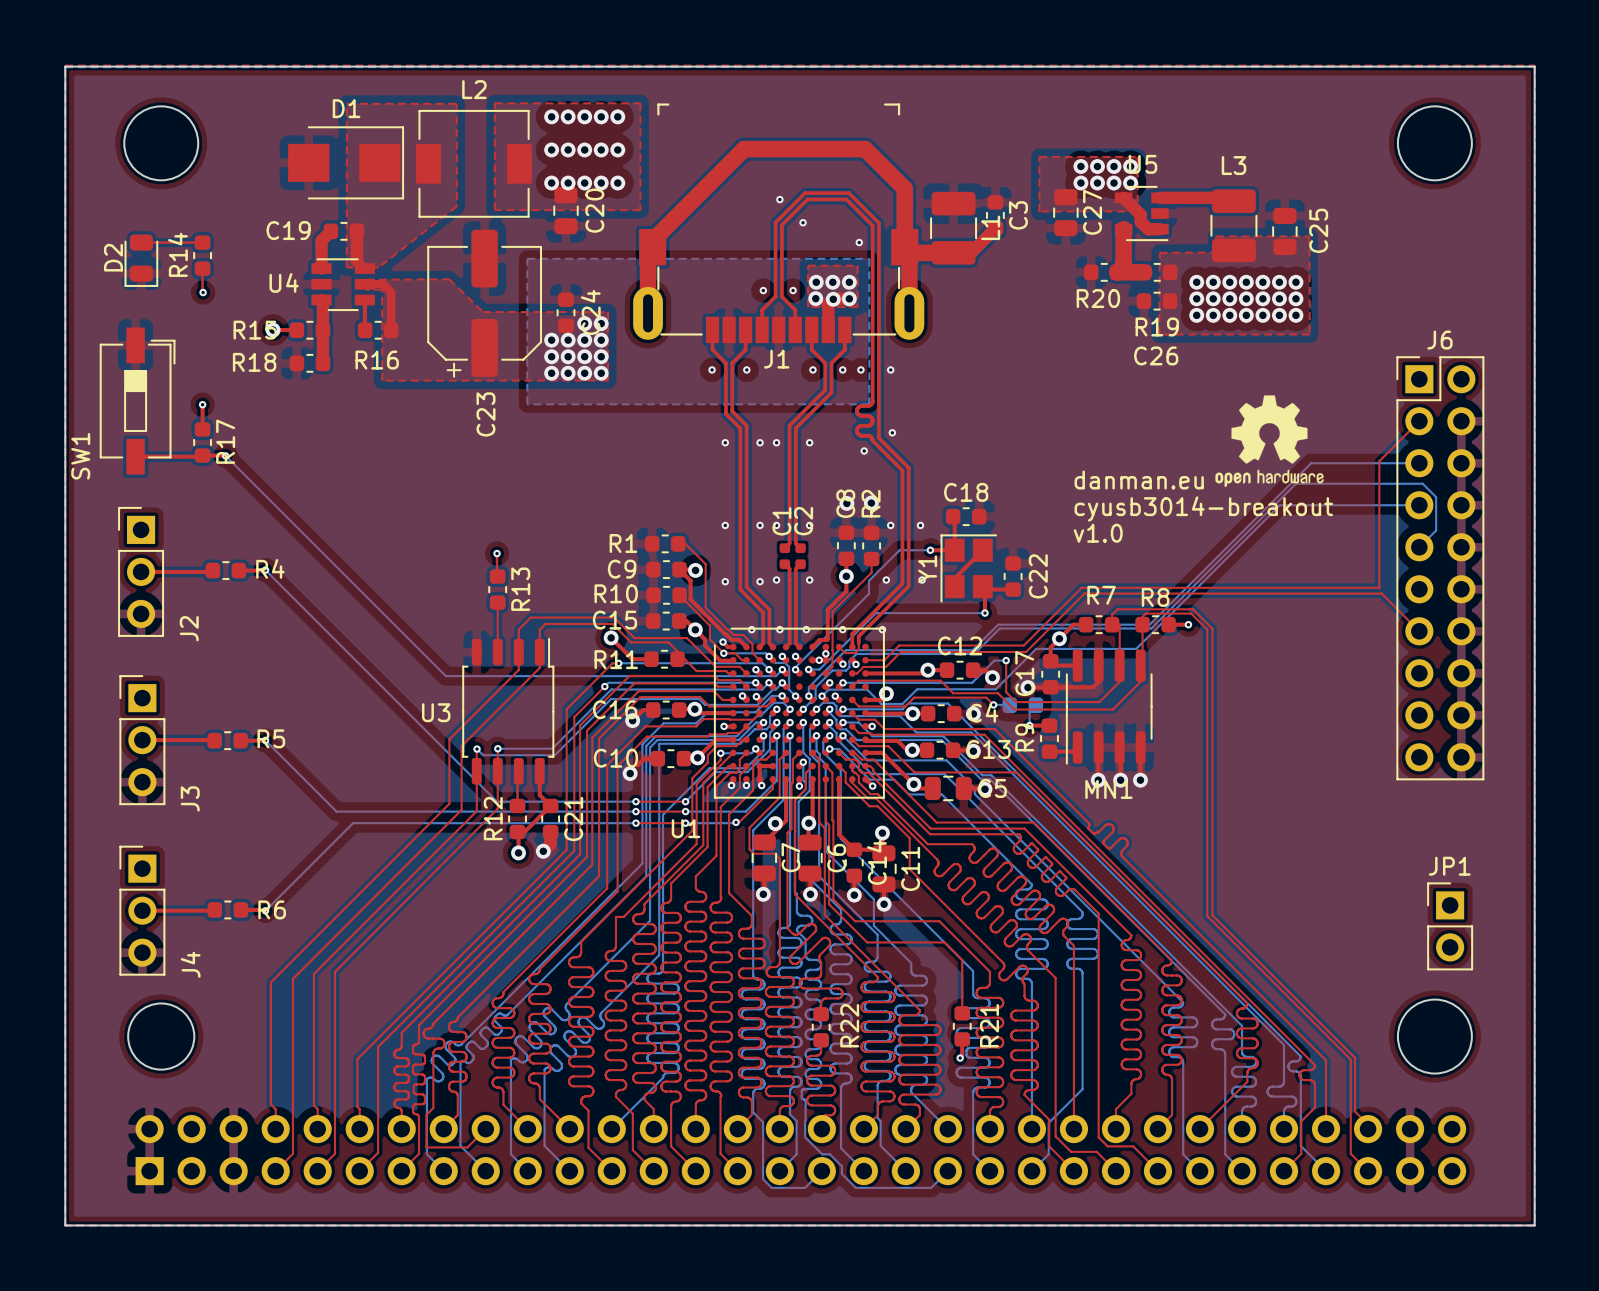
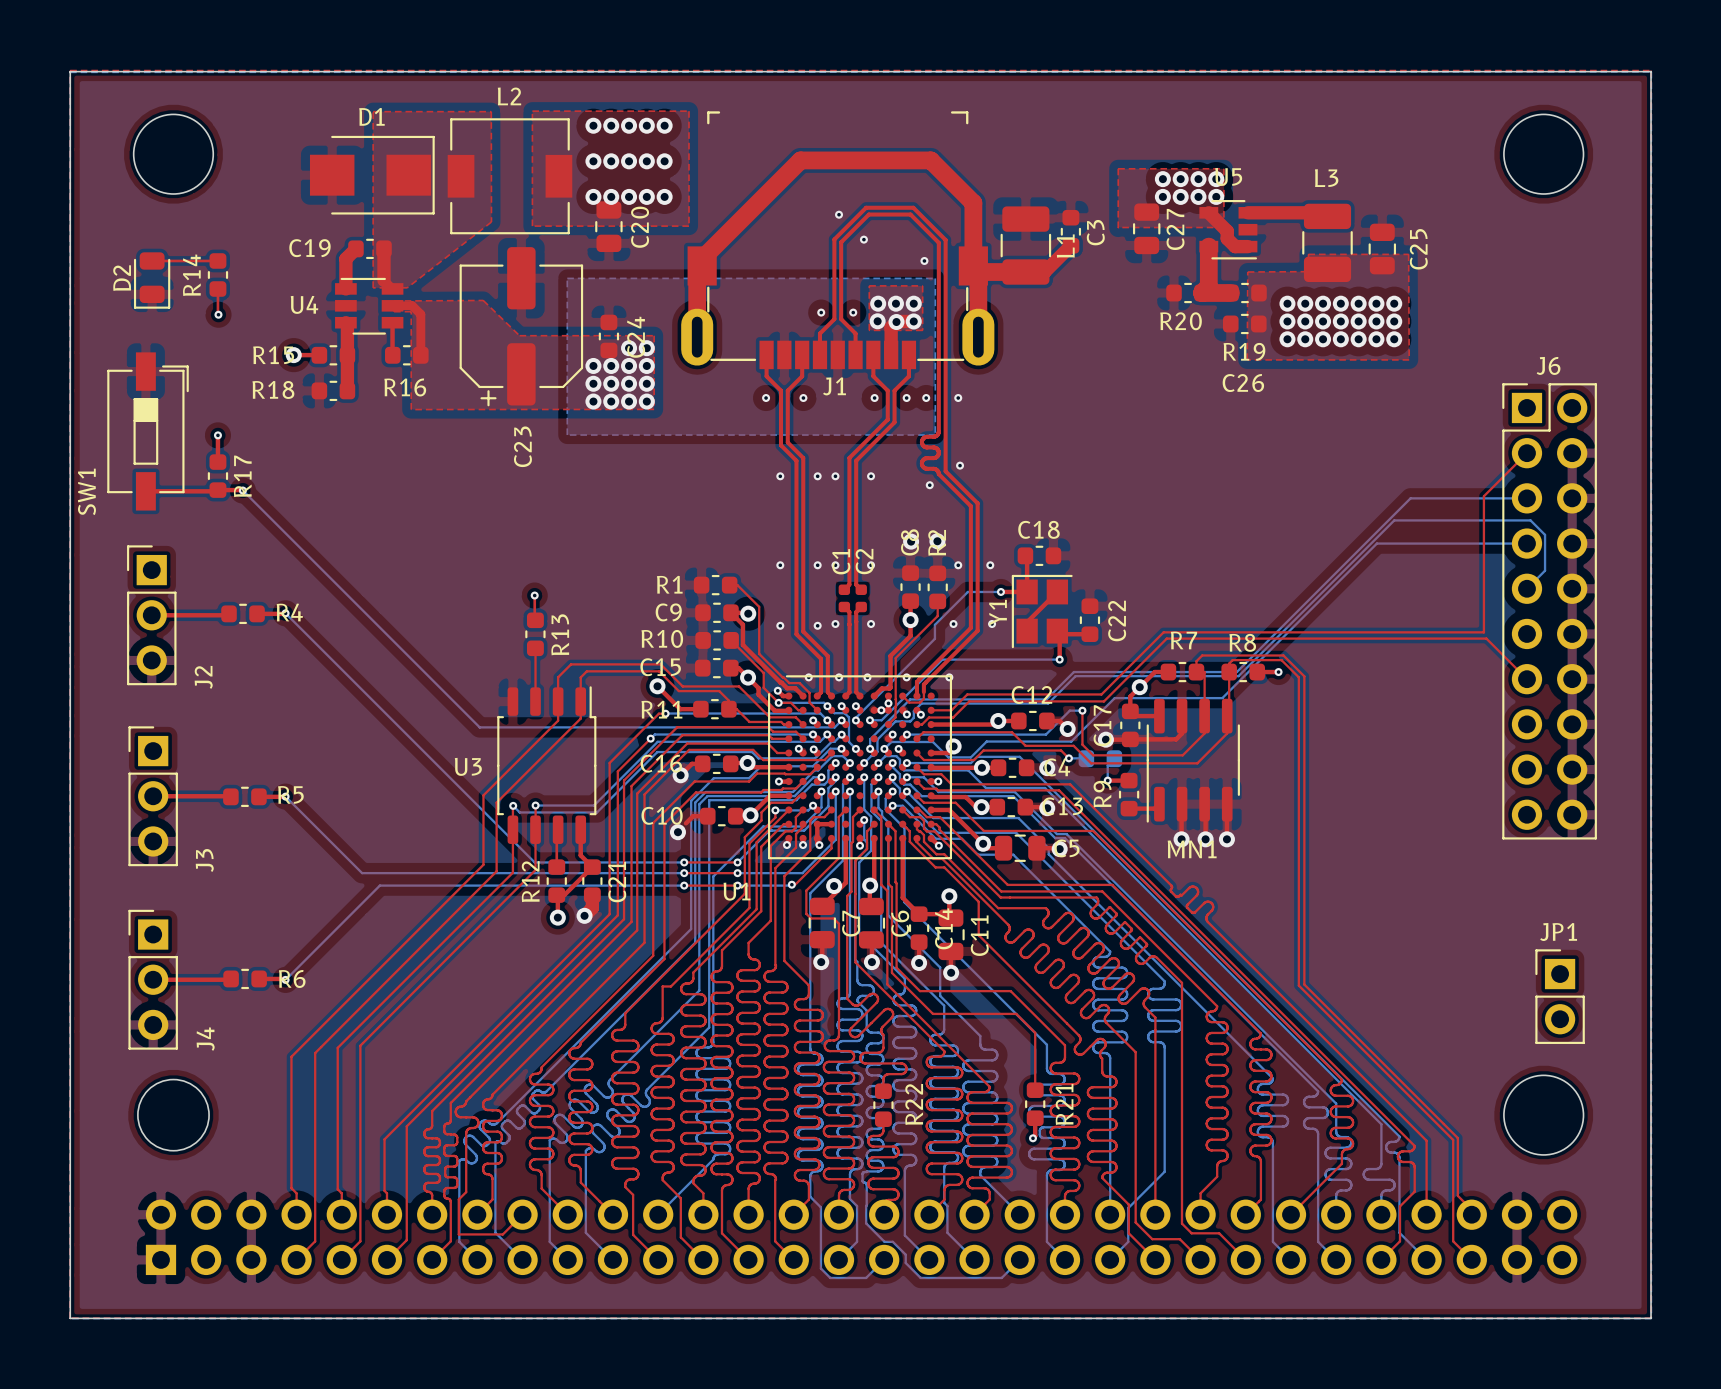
drawing: [1215, 395, 1324, 488] -> none
text: danman.eu (1139, 479) -> none
text: cyusb3014-breakout (1203, 508) -> none
text: v1.0 (1098, 533) -> none

